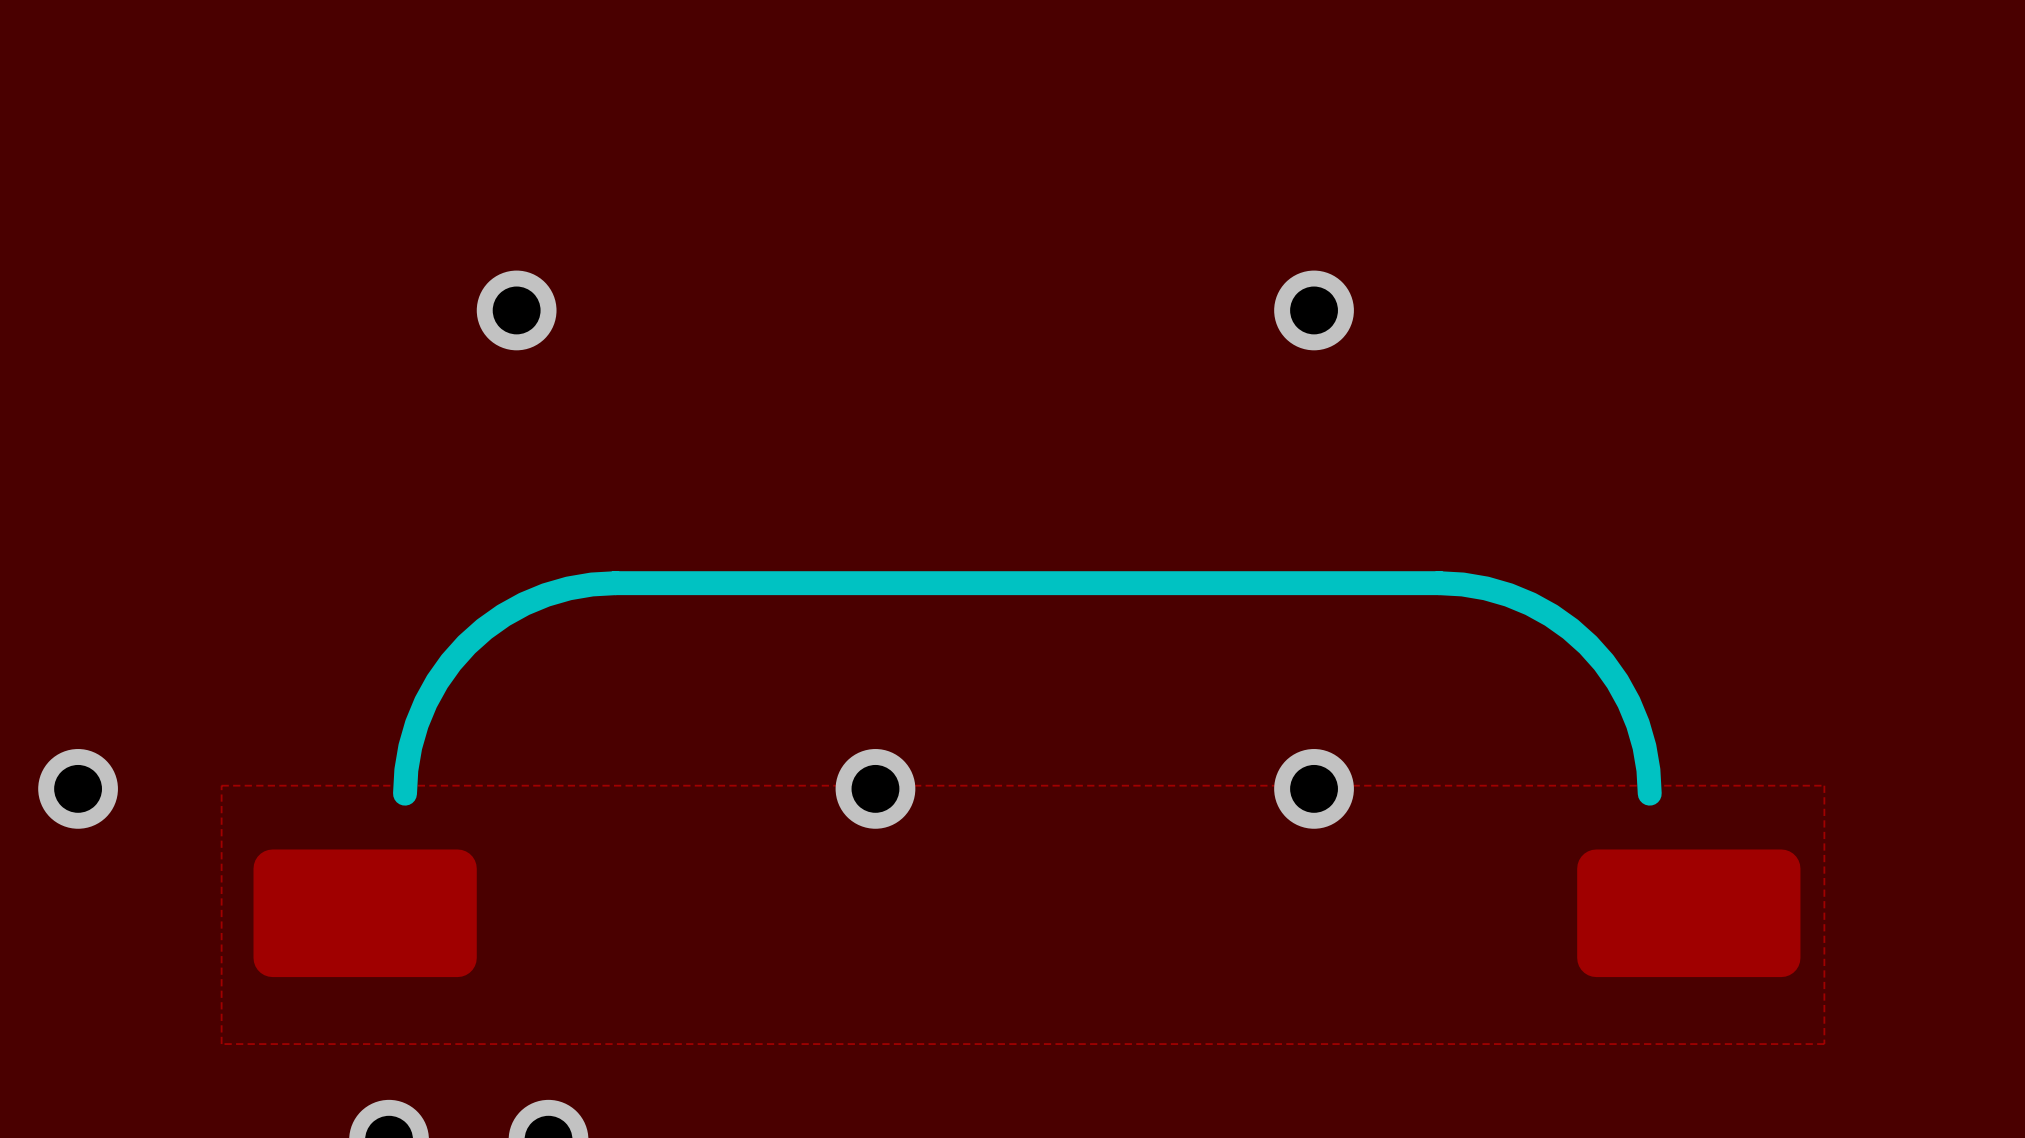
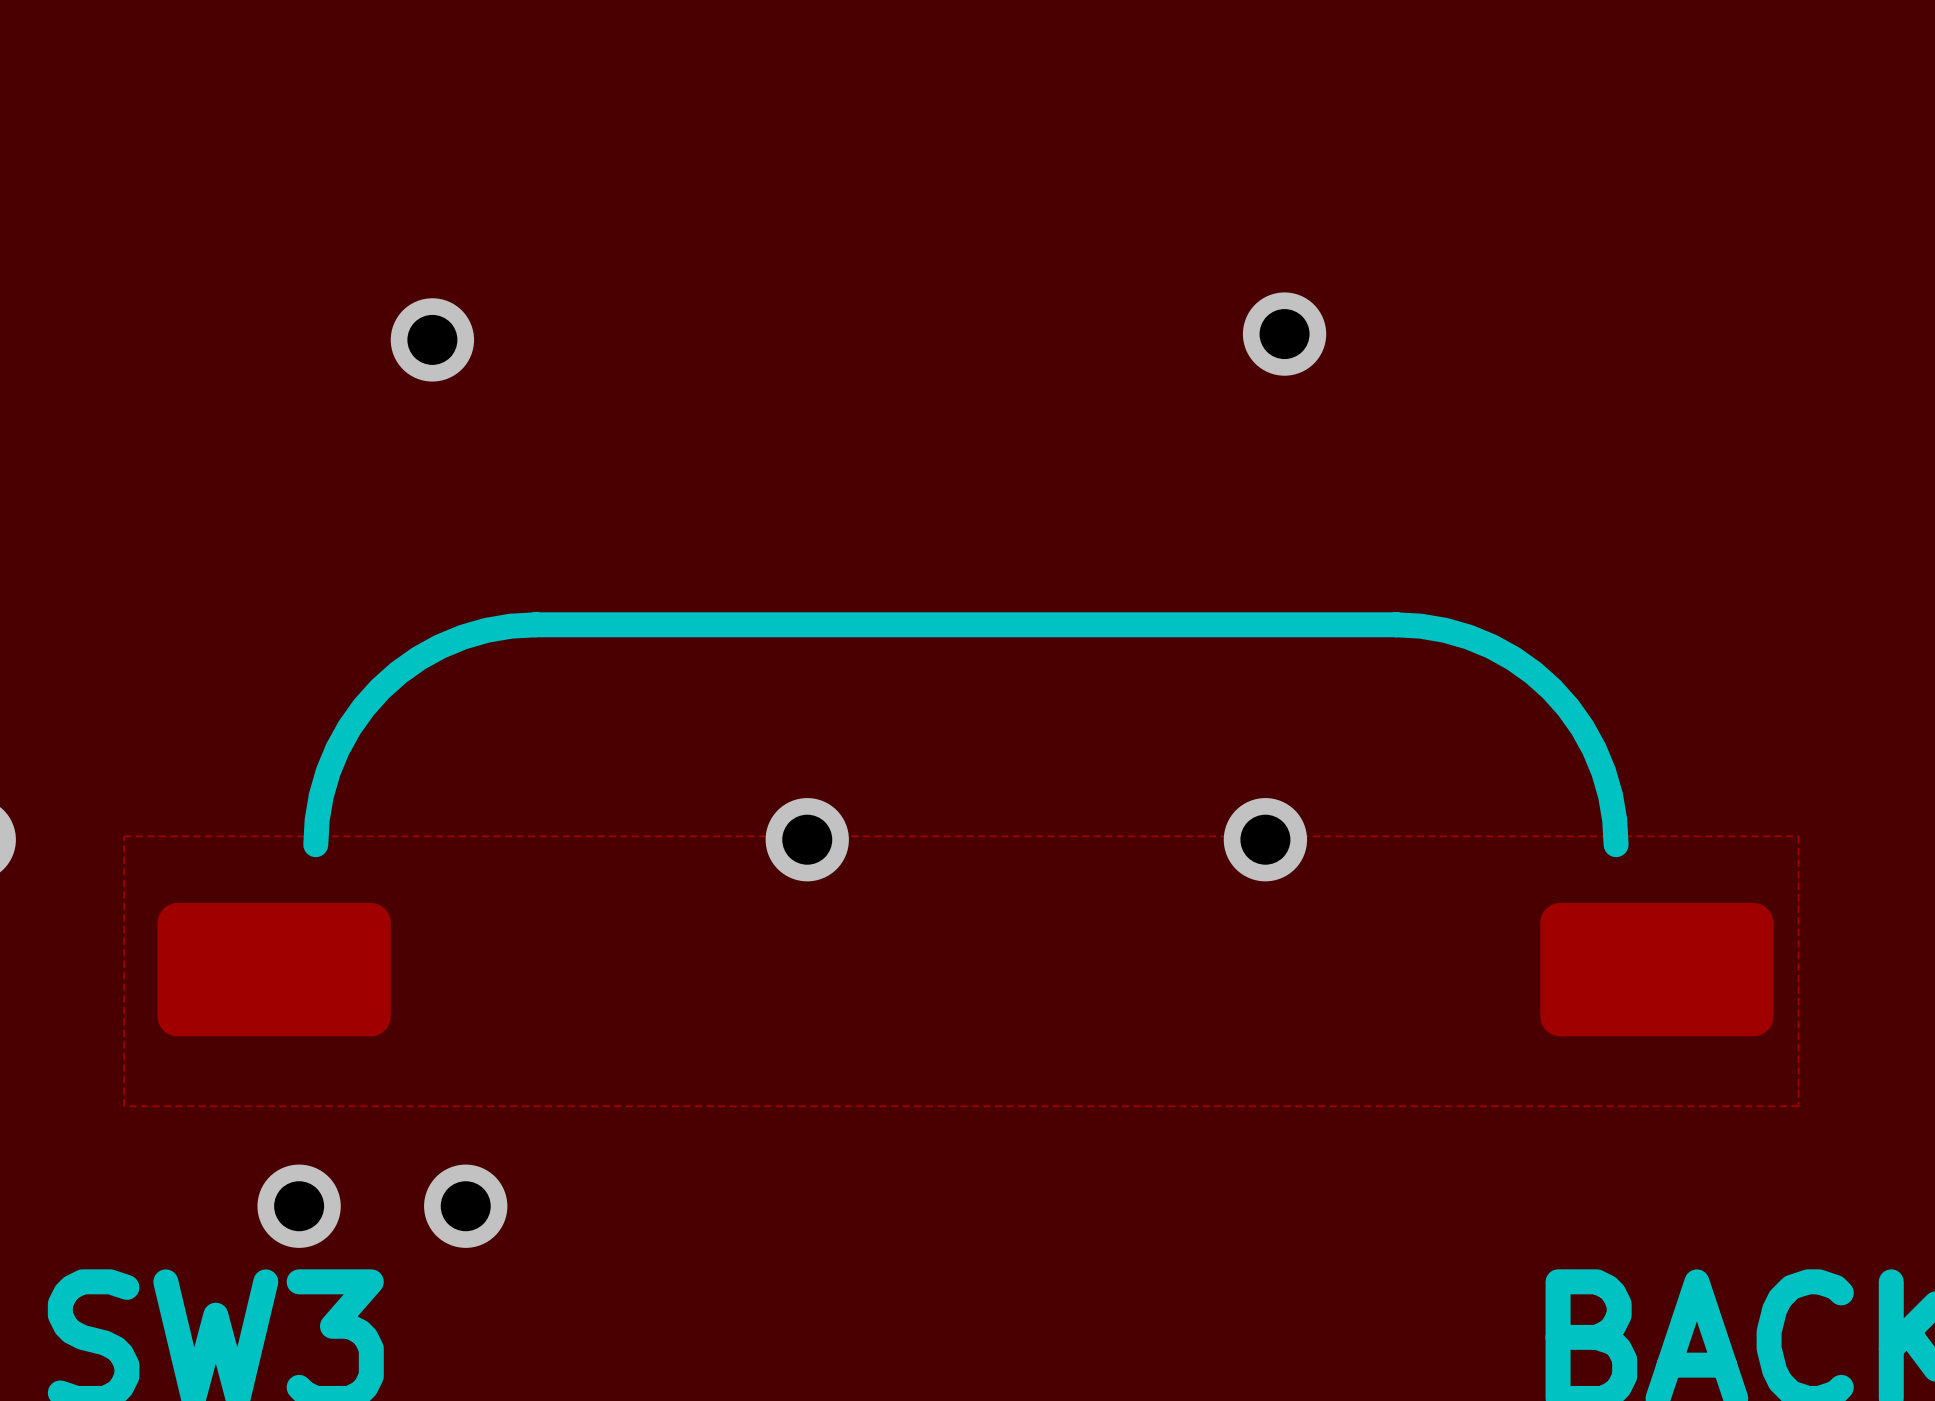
via position: (1314, 310) -> (1284, 334)

